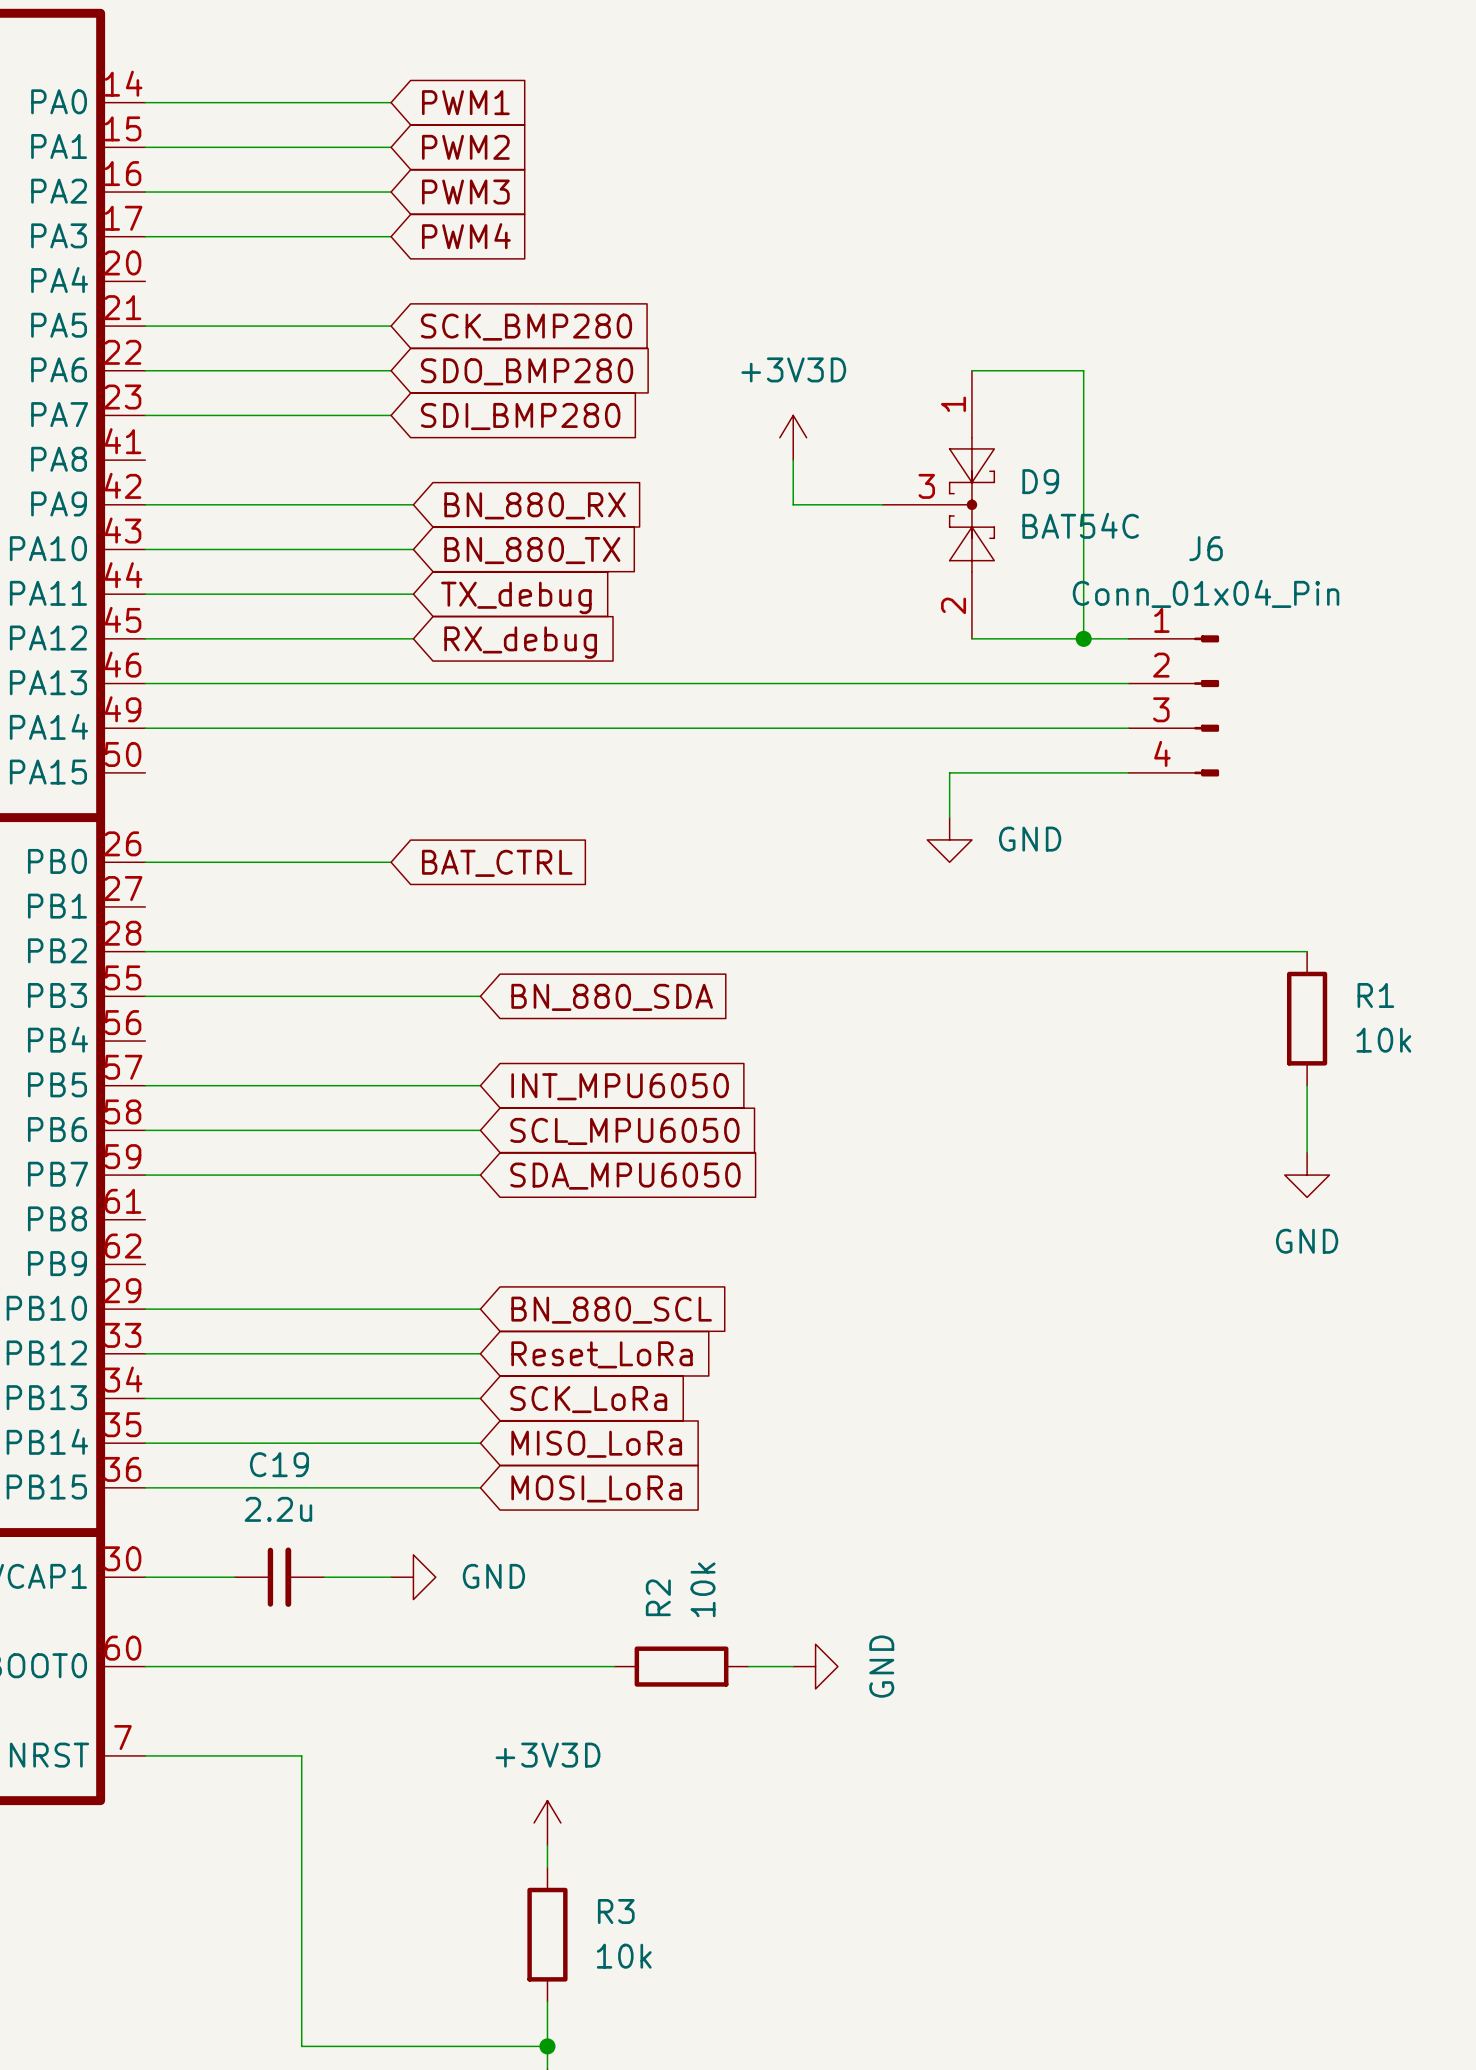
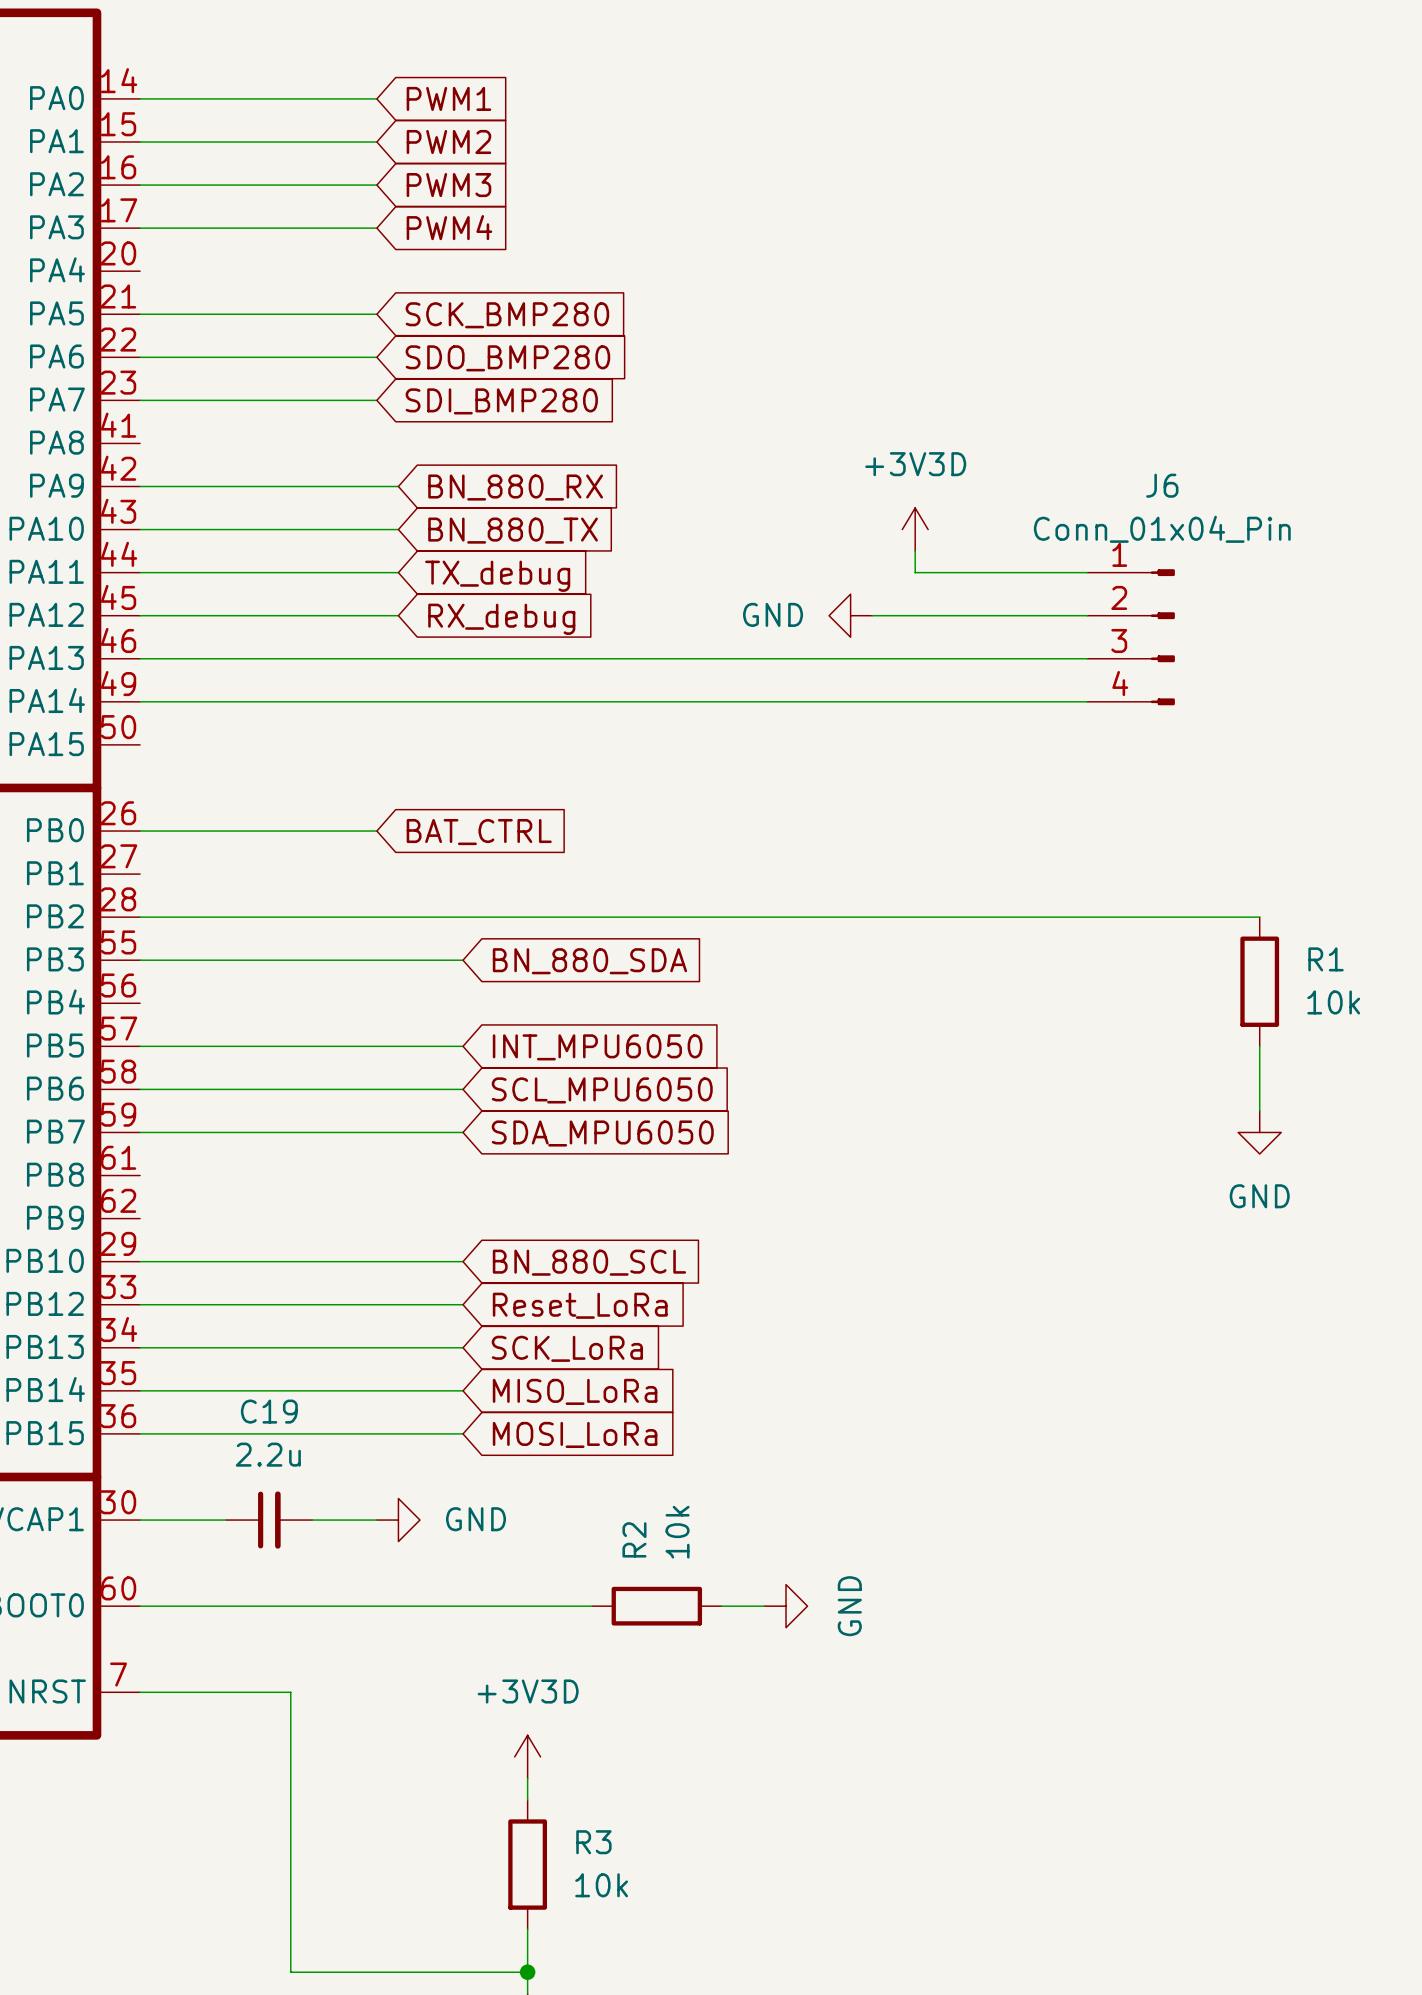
wire: (971, 370) (1083, 370) (1083, 638) -> none
power symbol position: +3V3D (793, 437) -> +3V3D (915, 529)
wire: (793, 460) (793, 504) (882, 504) -> none
D9: BAT54C (938, 504) -> none
wire: none -> (915, 551) (915, 572) (1087, 572)
wire: none -> (872, 615) (936, 615)
junction: (1083, 638) -> none
J6 position: (1173, 705) -> (1131, 637)
wire: (1128, 772) (949, 772) (949, 817) -> none
power symbol rotation: 0° (949, 839) -> 90° clockwise (850, 615)
power symbol position: GND (949, 839) -> GND (850, 615)
power symbol text position: GND (1030, 839) -> GND (773, 614)

